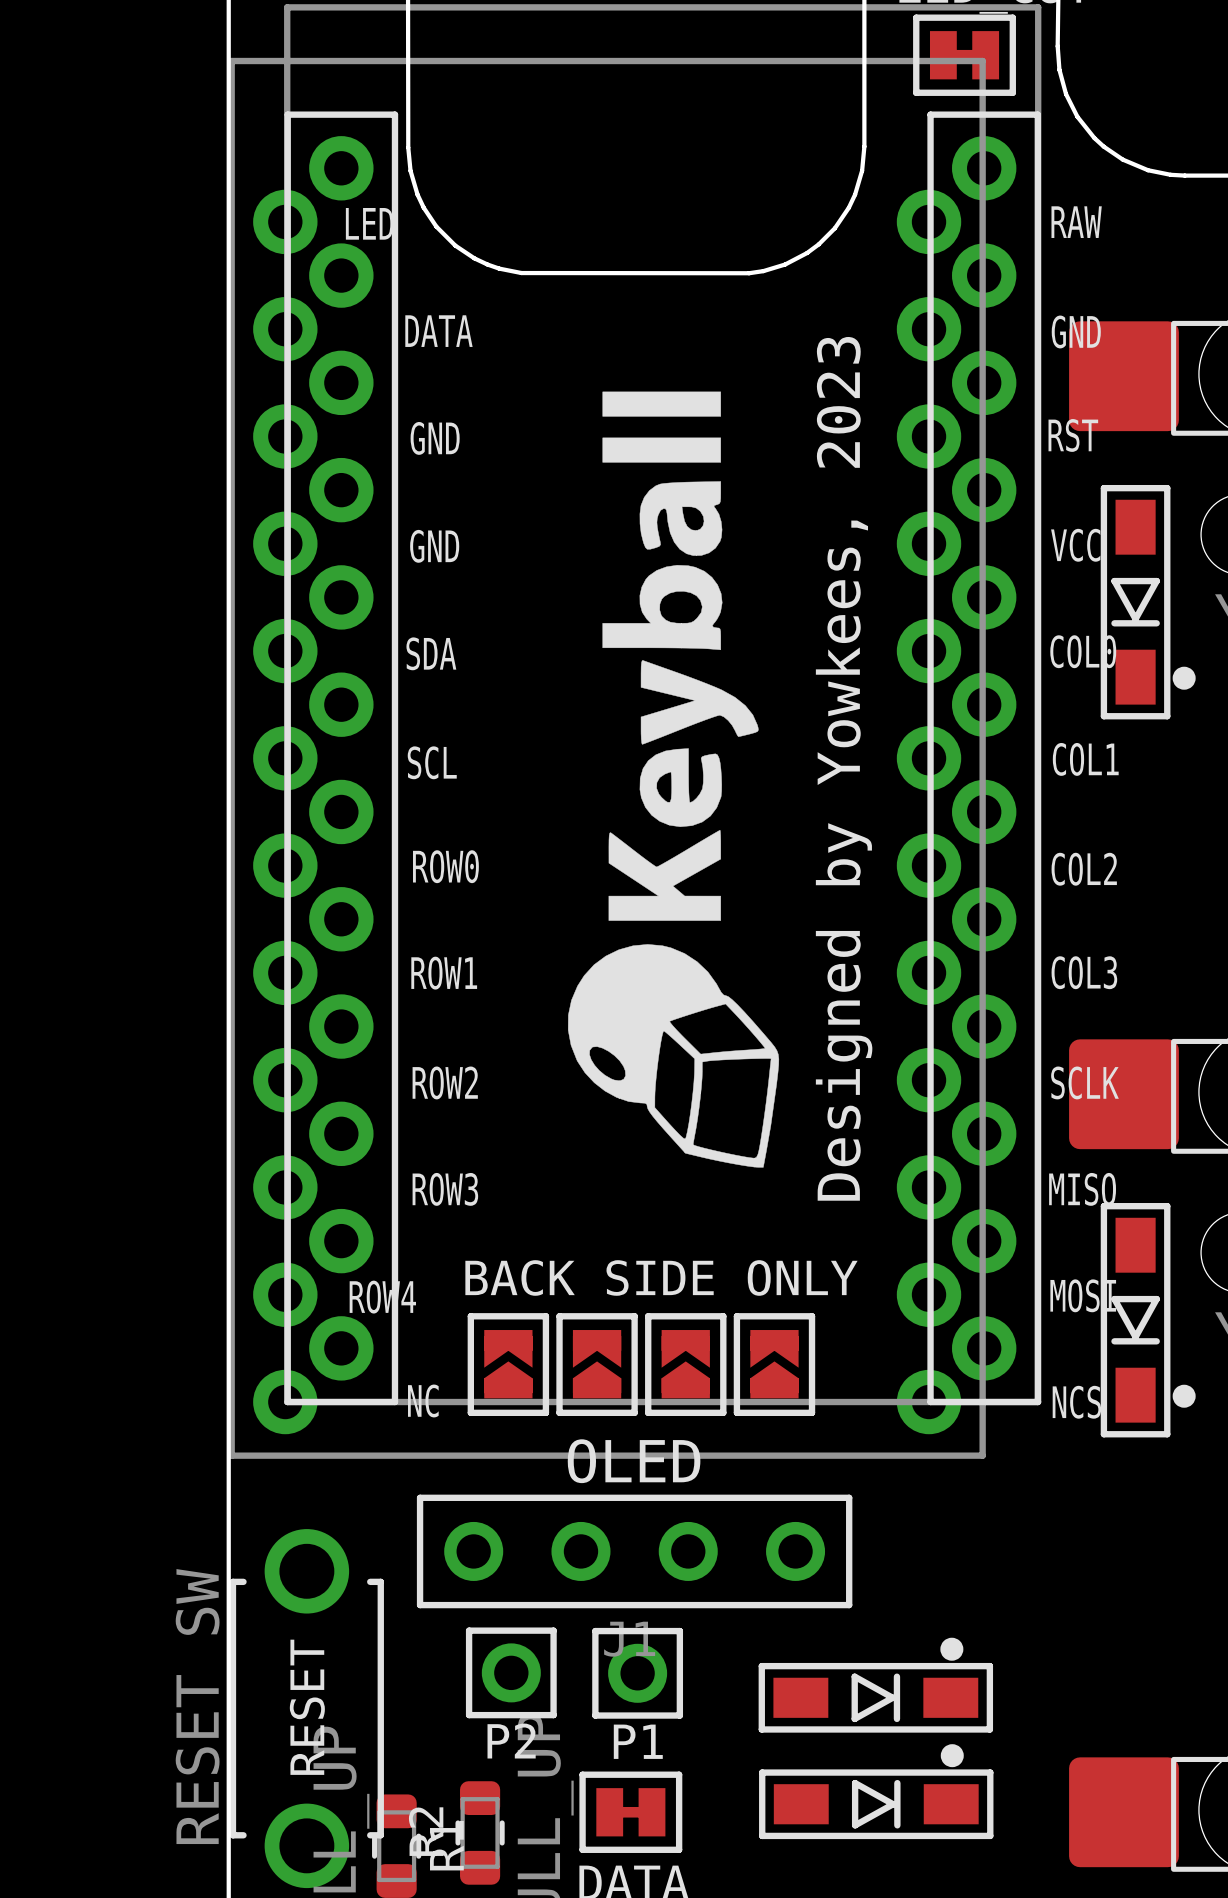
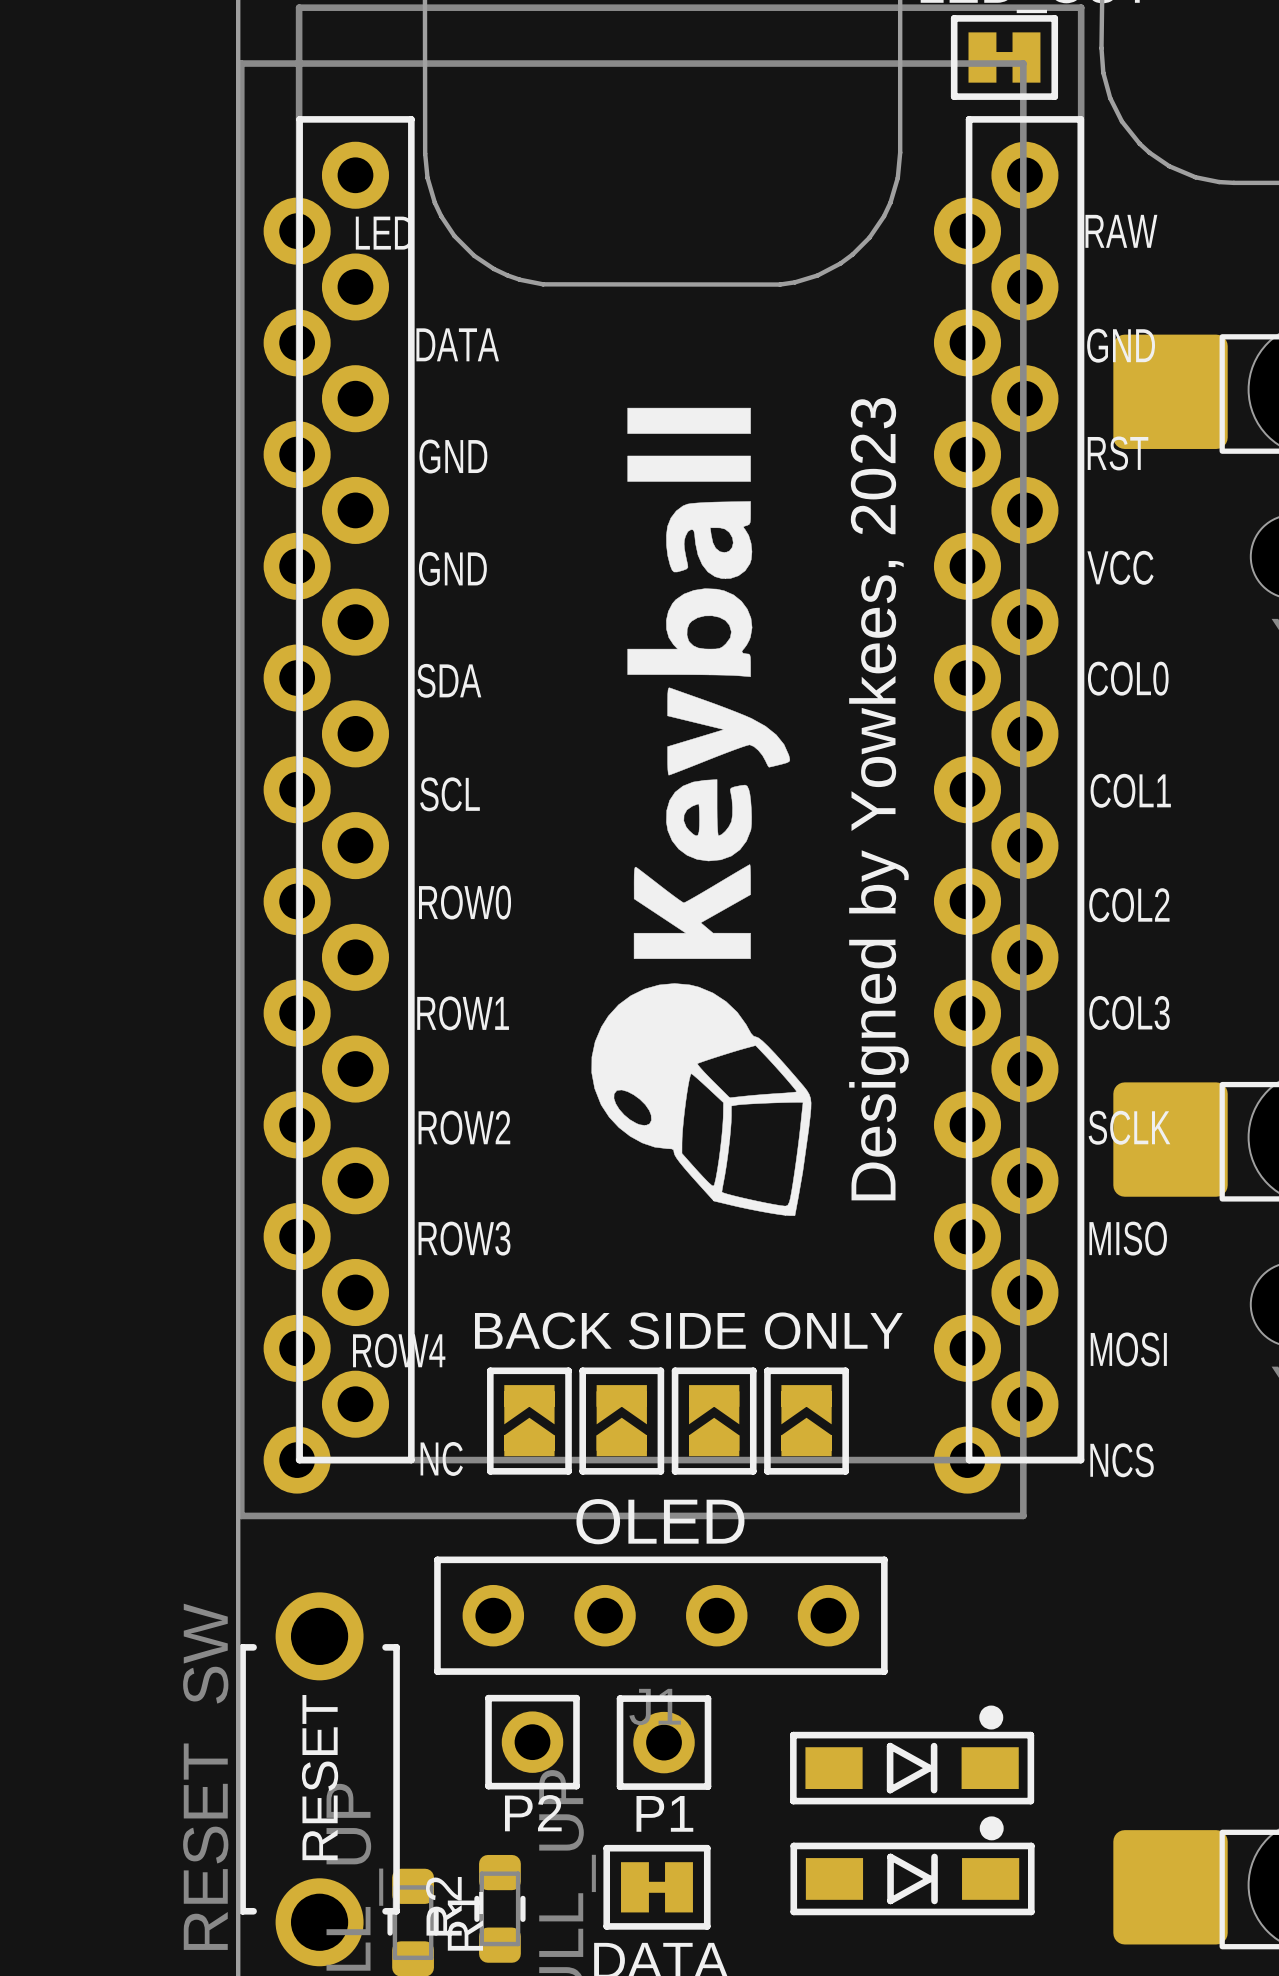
part: (1148, 602) -> none
part: (1148, 1320) -> none

